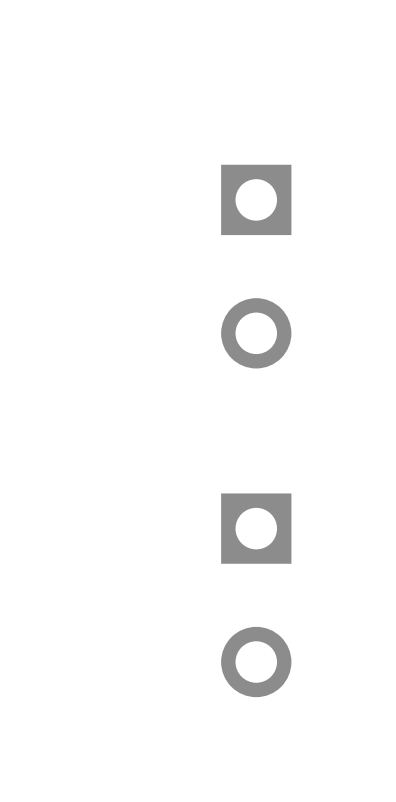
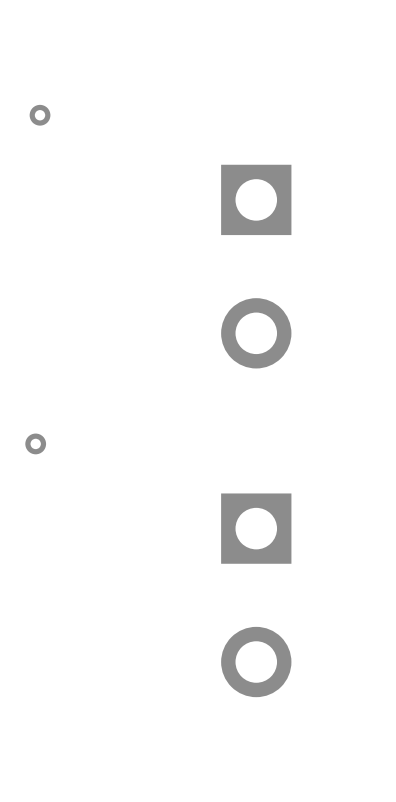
via: none -> (40, 115)
via: none -> (35, 443)

